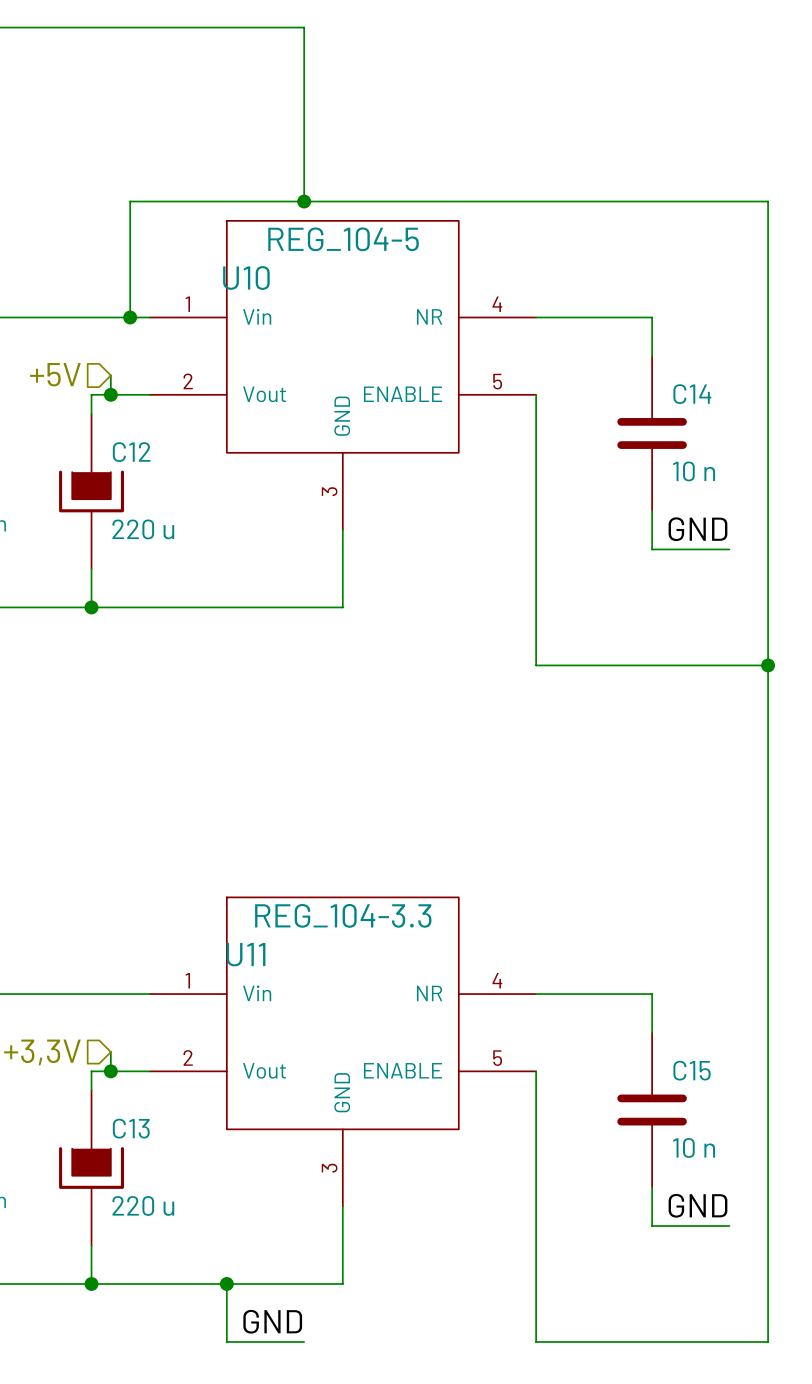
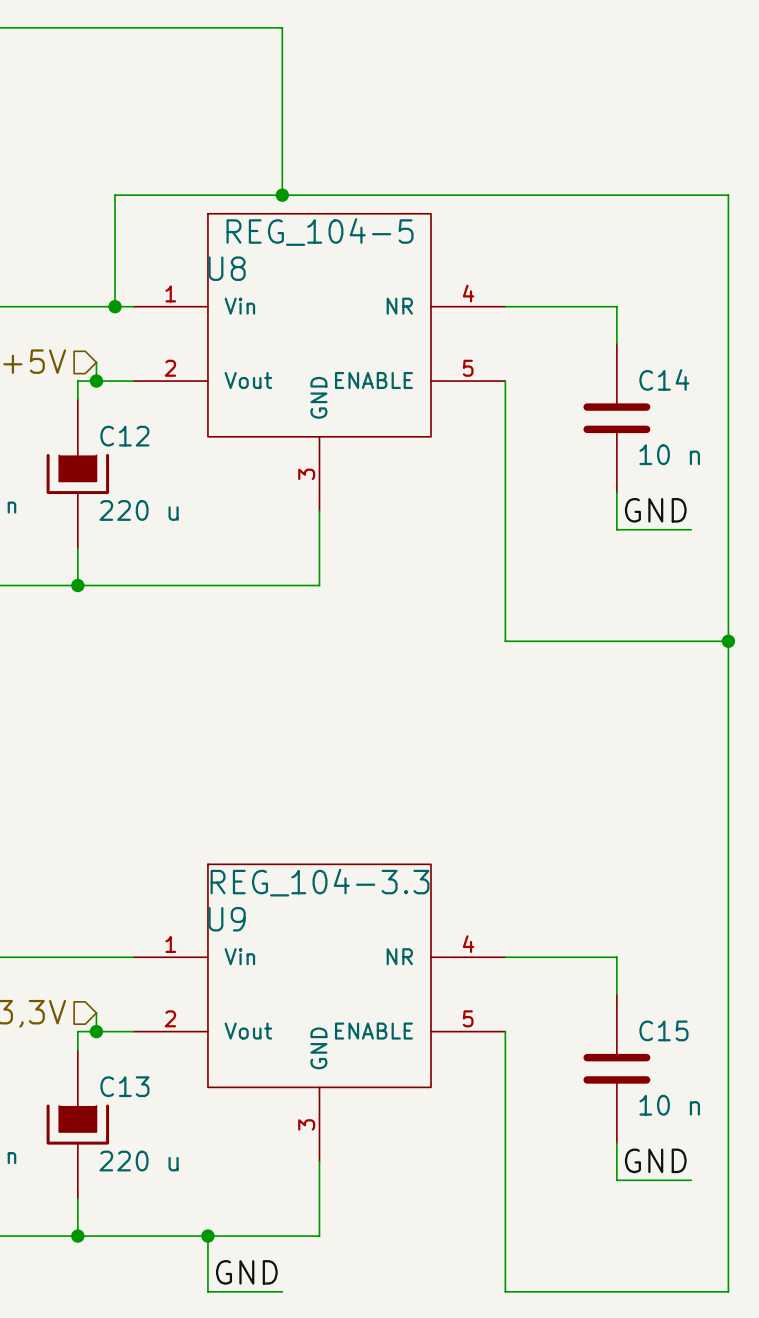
U10 name: U10 (246, 277) -> U8 (227, 268)
U11 name: U11 (246, 954) -> U9 (227, 919)

